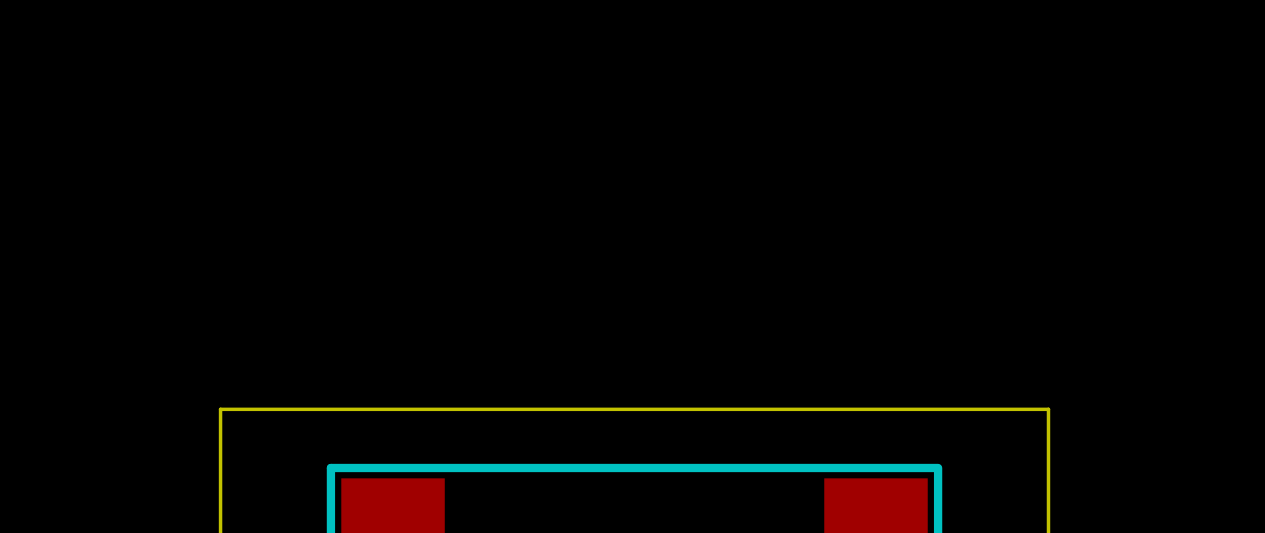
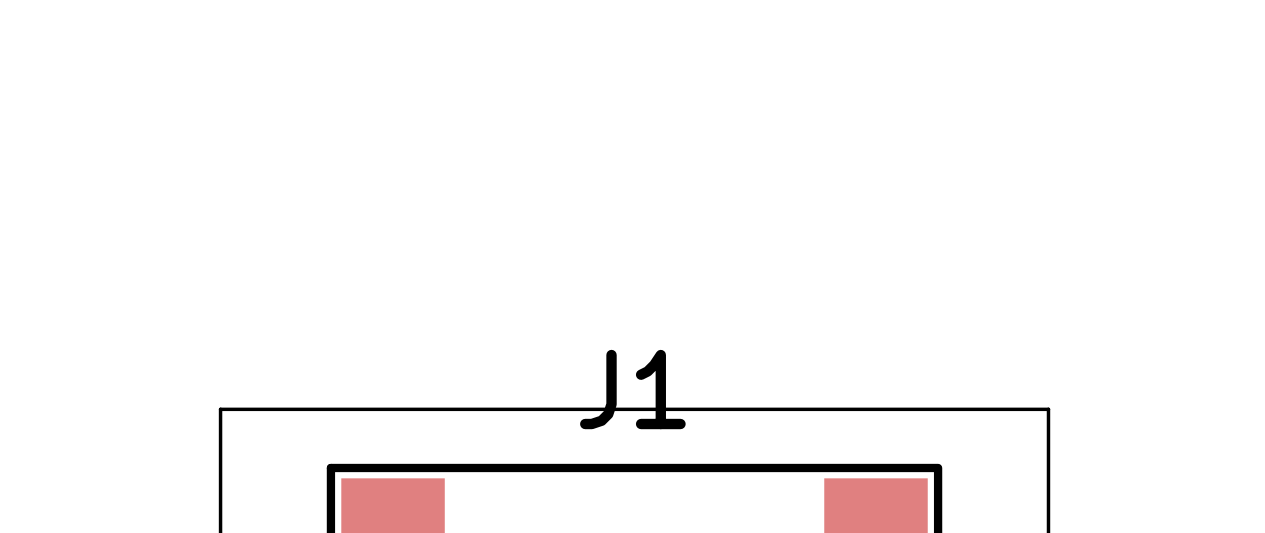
J1 name: none -> J1 (632, 389)

